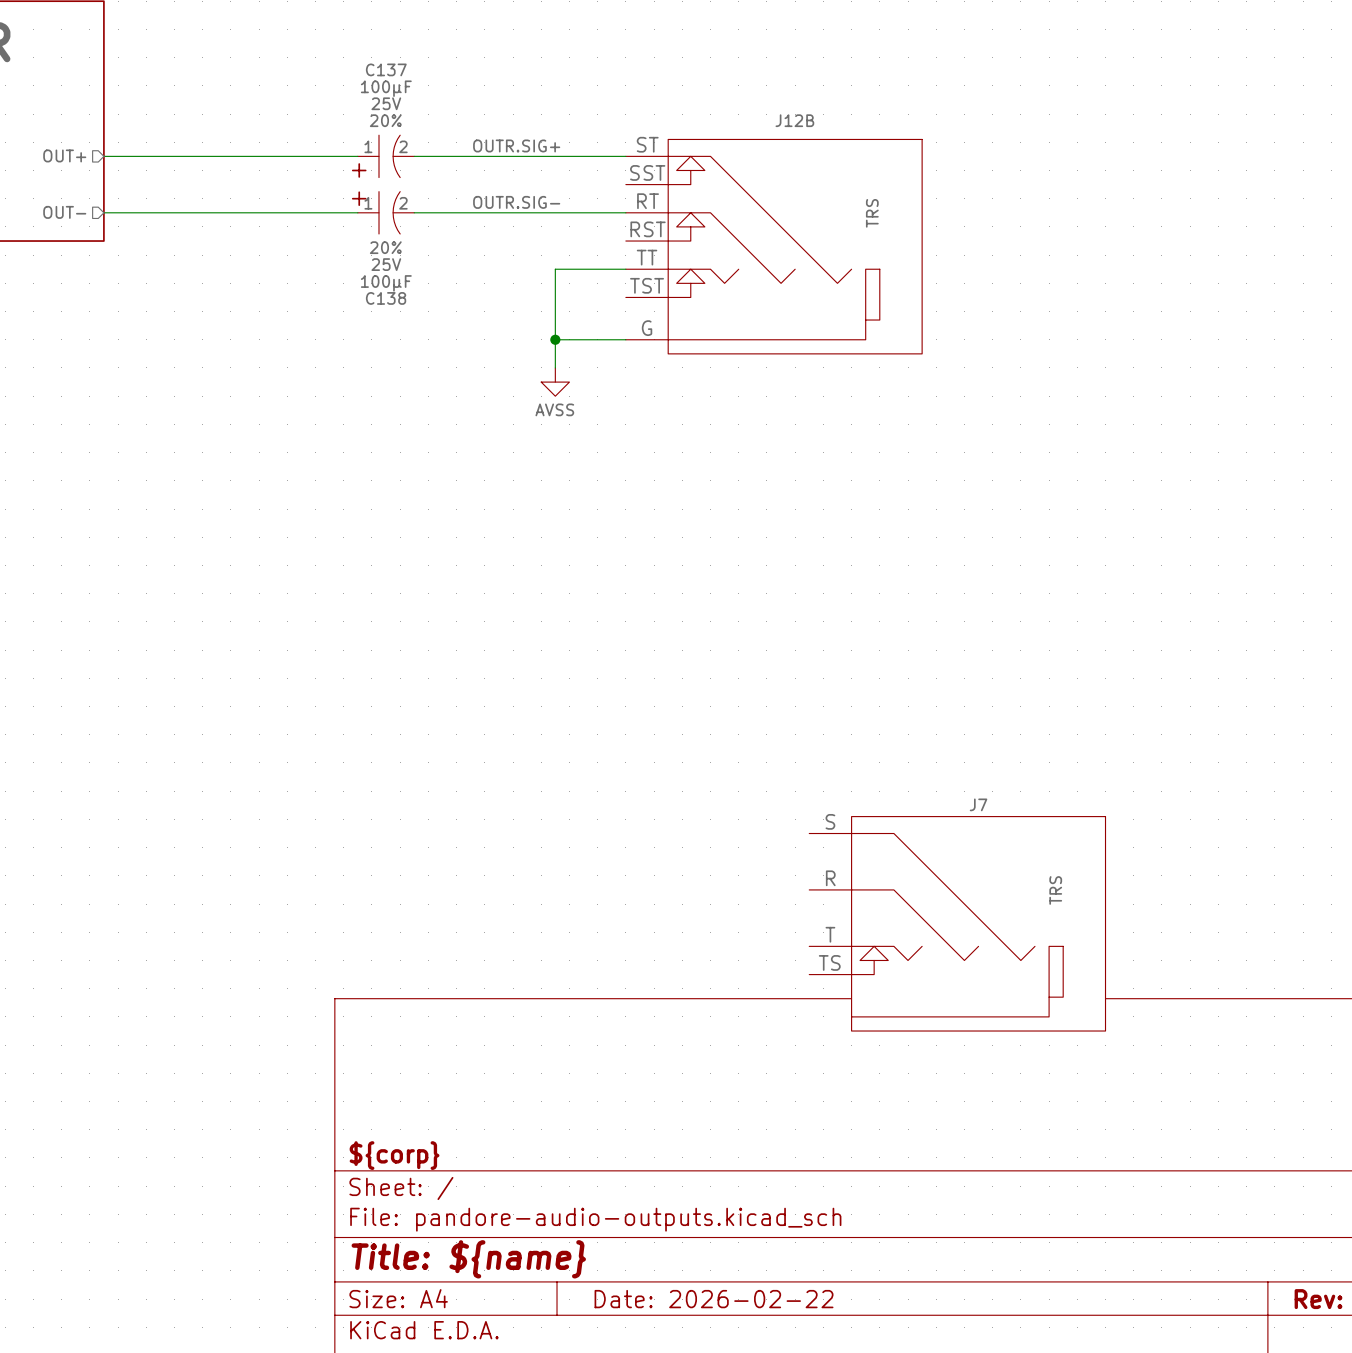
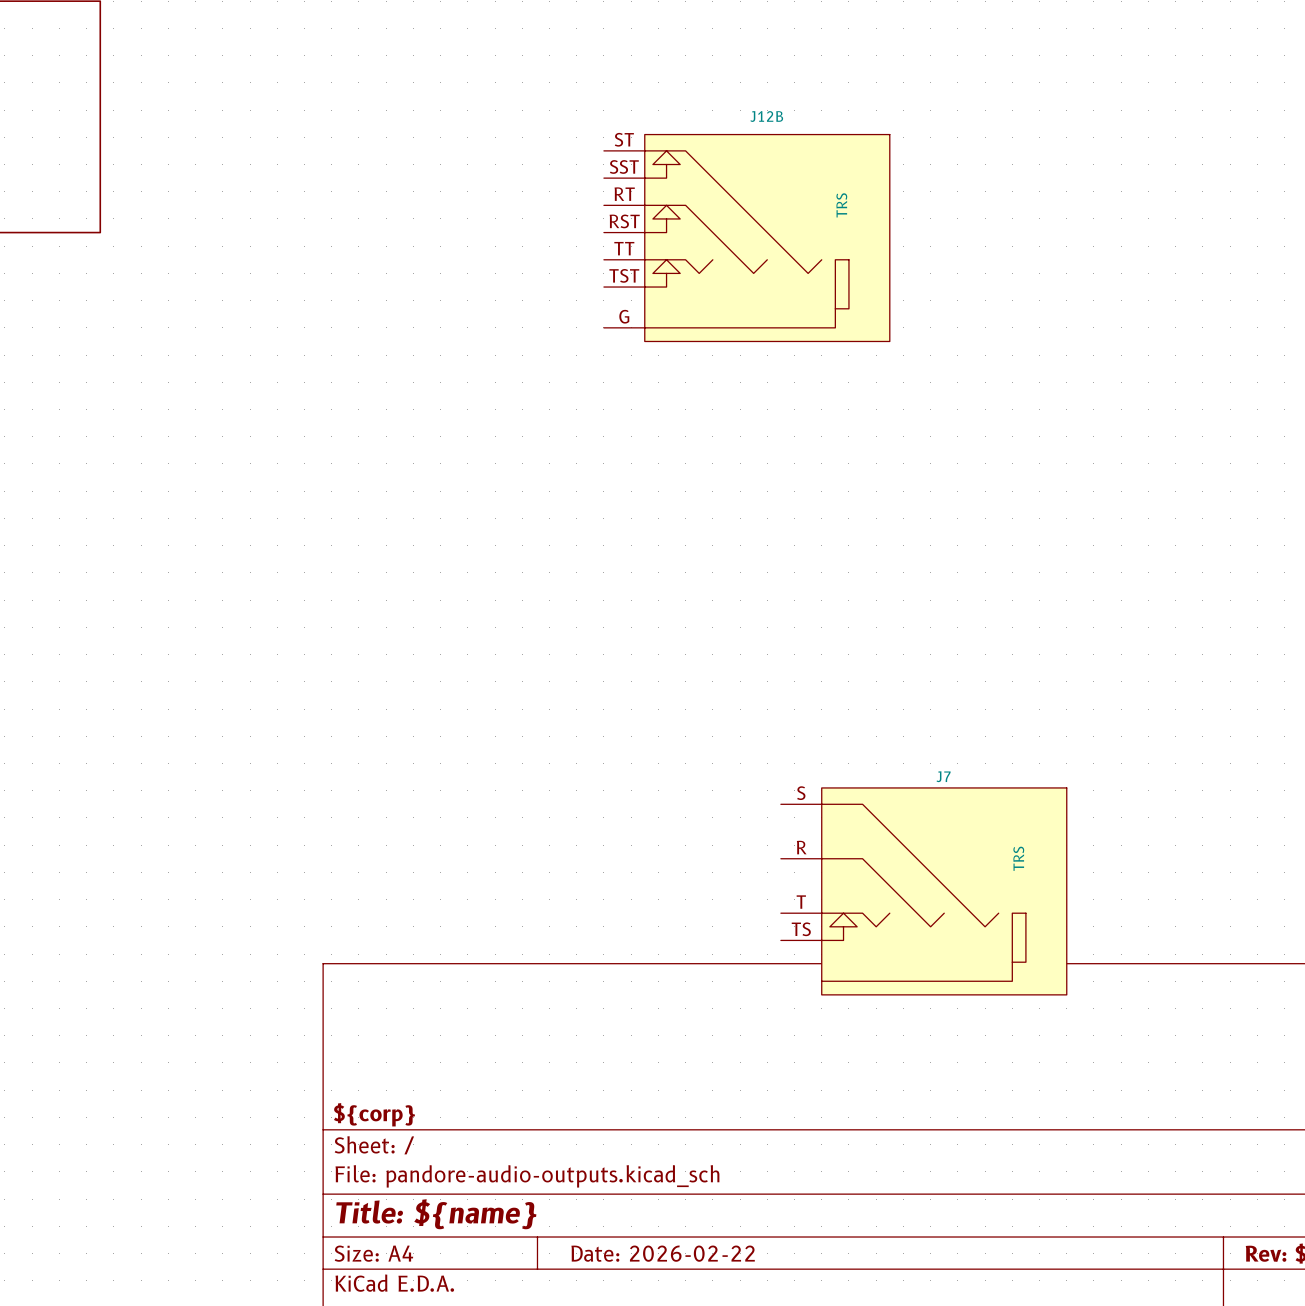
label: OUTR.SIG+ (516, 145) -> none
sheet pin: OUT+ (64, 155) -> none
wire: (103, 156) (357, 156) -> none
C137: (386, 156) -> none
wire: (414, 156) (625, 156) -> none
label: OUTR.SIG- (516, 202) -> none
sheet pin: OUT- (64, 212) -> none
wire: (103, 212) (357, 212) -> none
C138: (386, 212) -> none
wire: (414, 212) (625, 212) -> none
wire: (625, 269) (555, 269) (555, 367) -> none
wire: (555, 339) (625, 339) -> none
junction: (555, 339) -> none
power symbol: AVSS (555, 382) -> none

